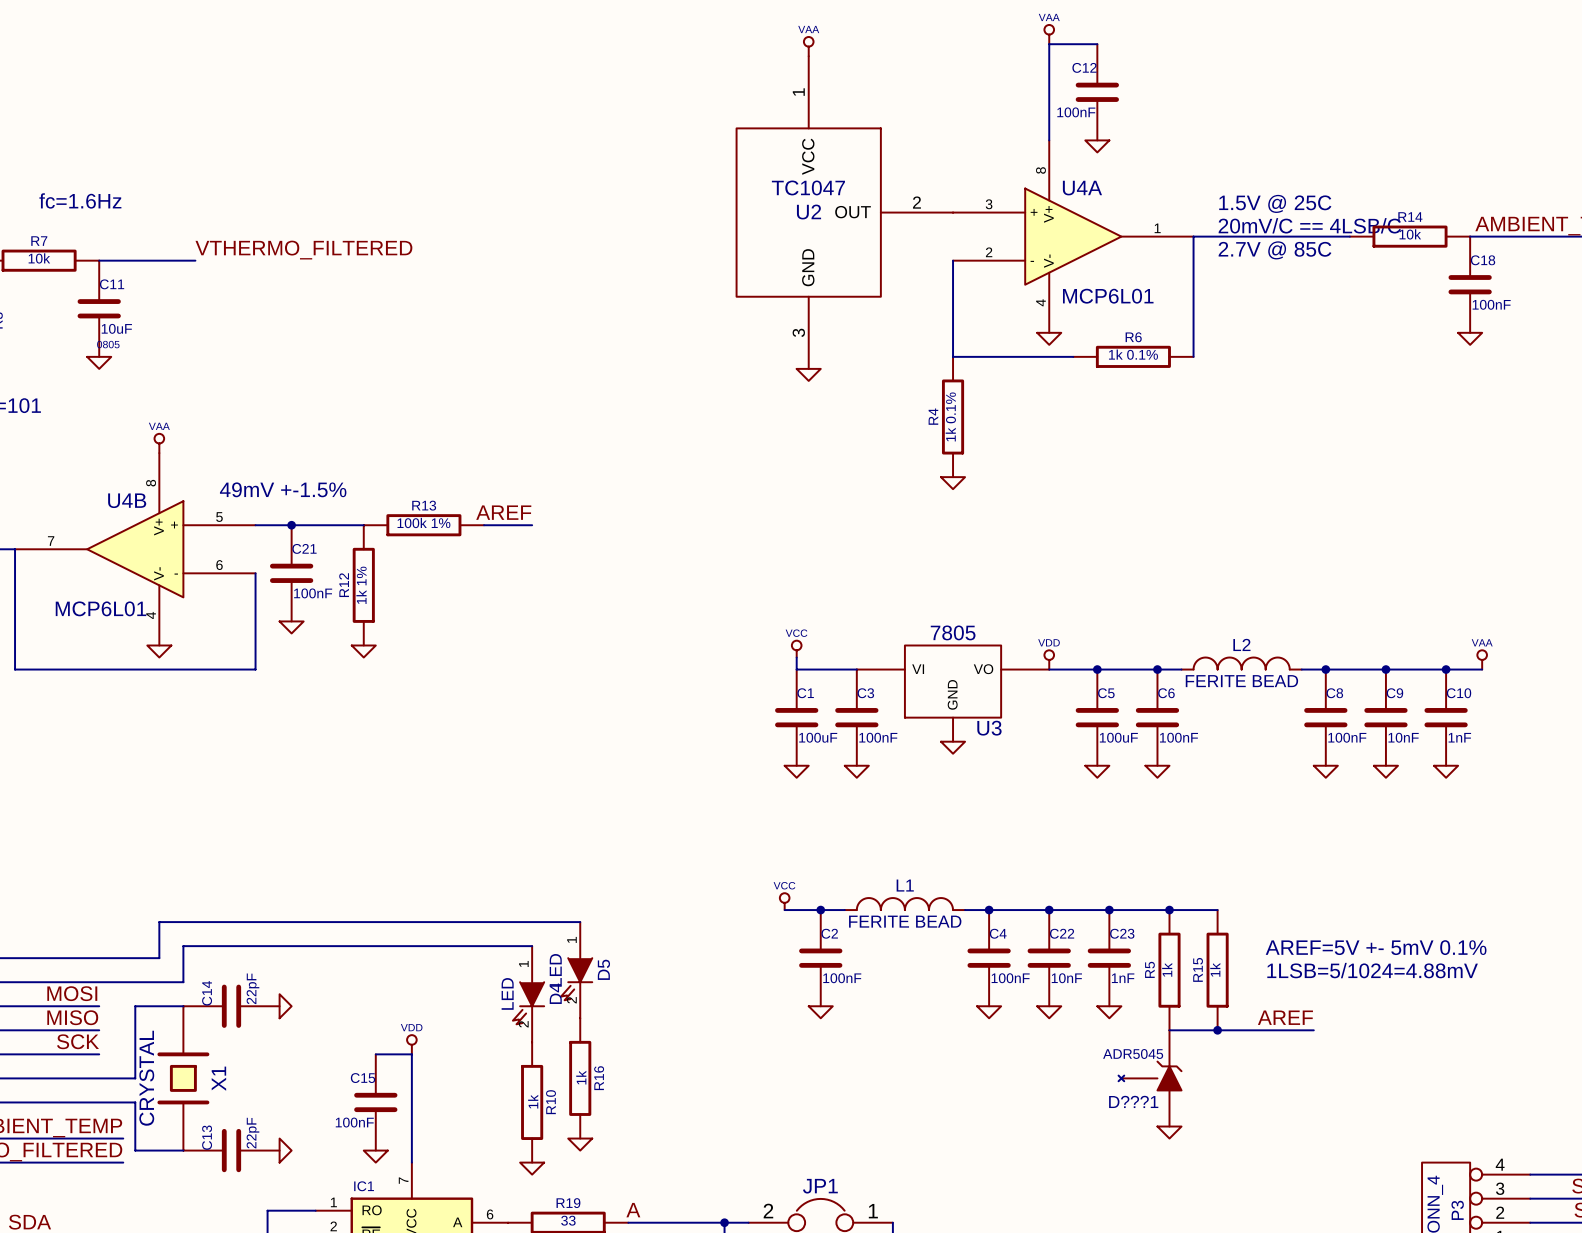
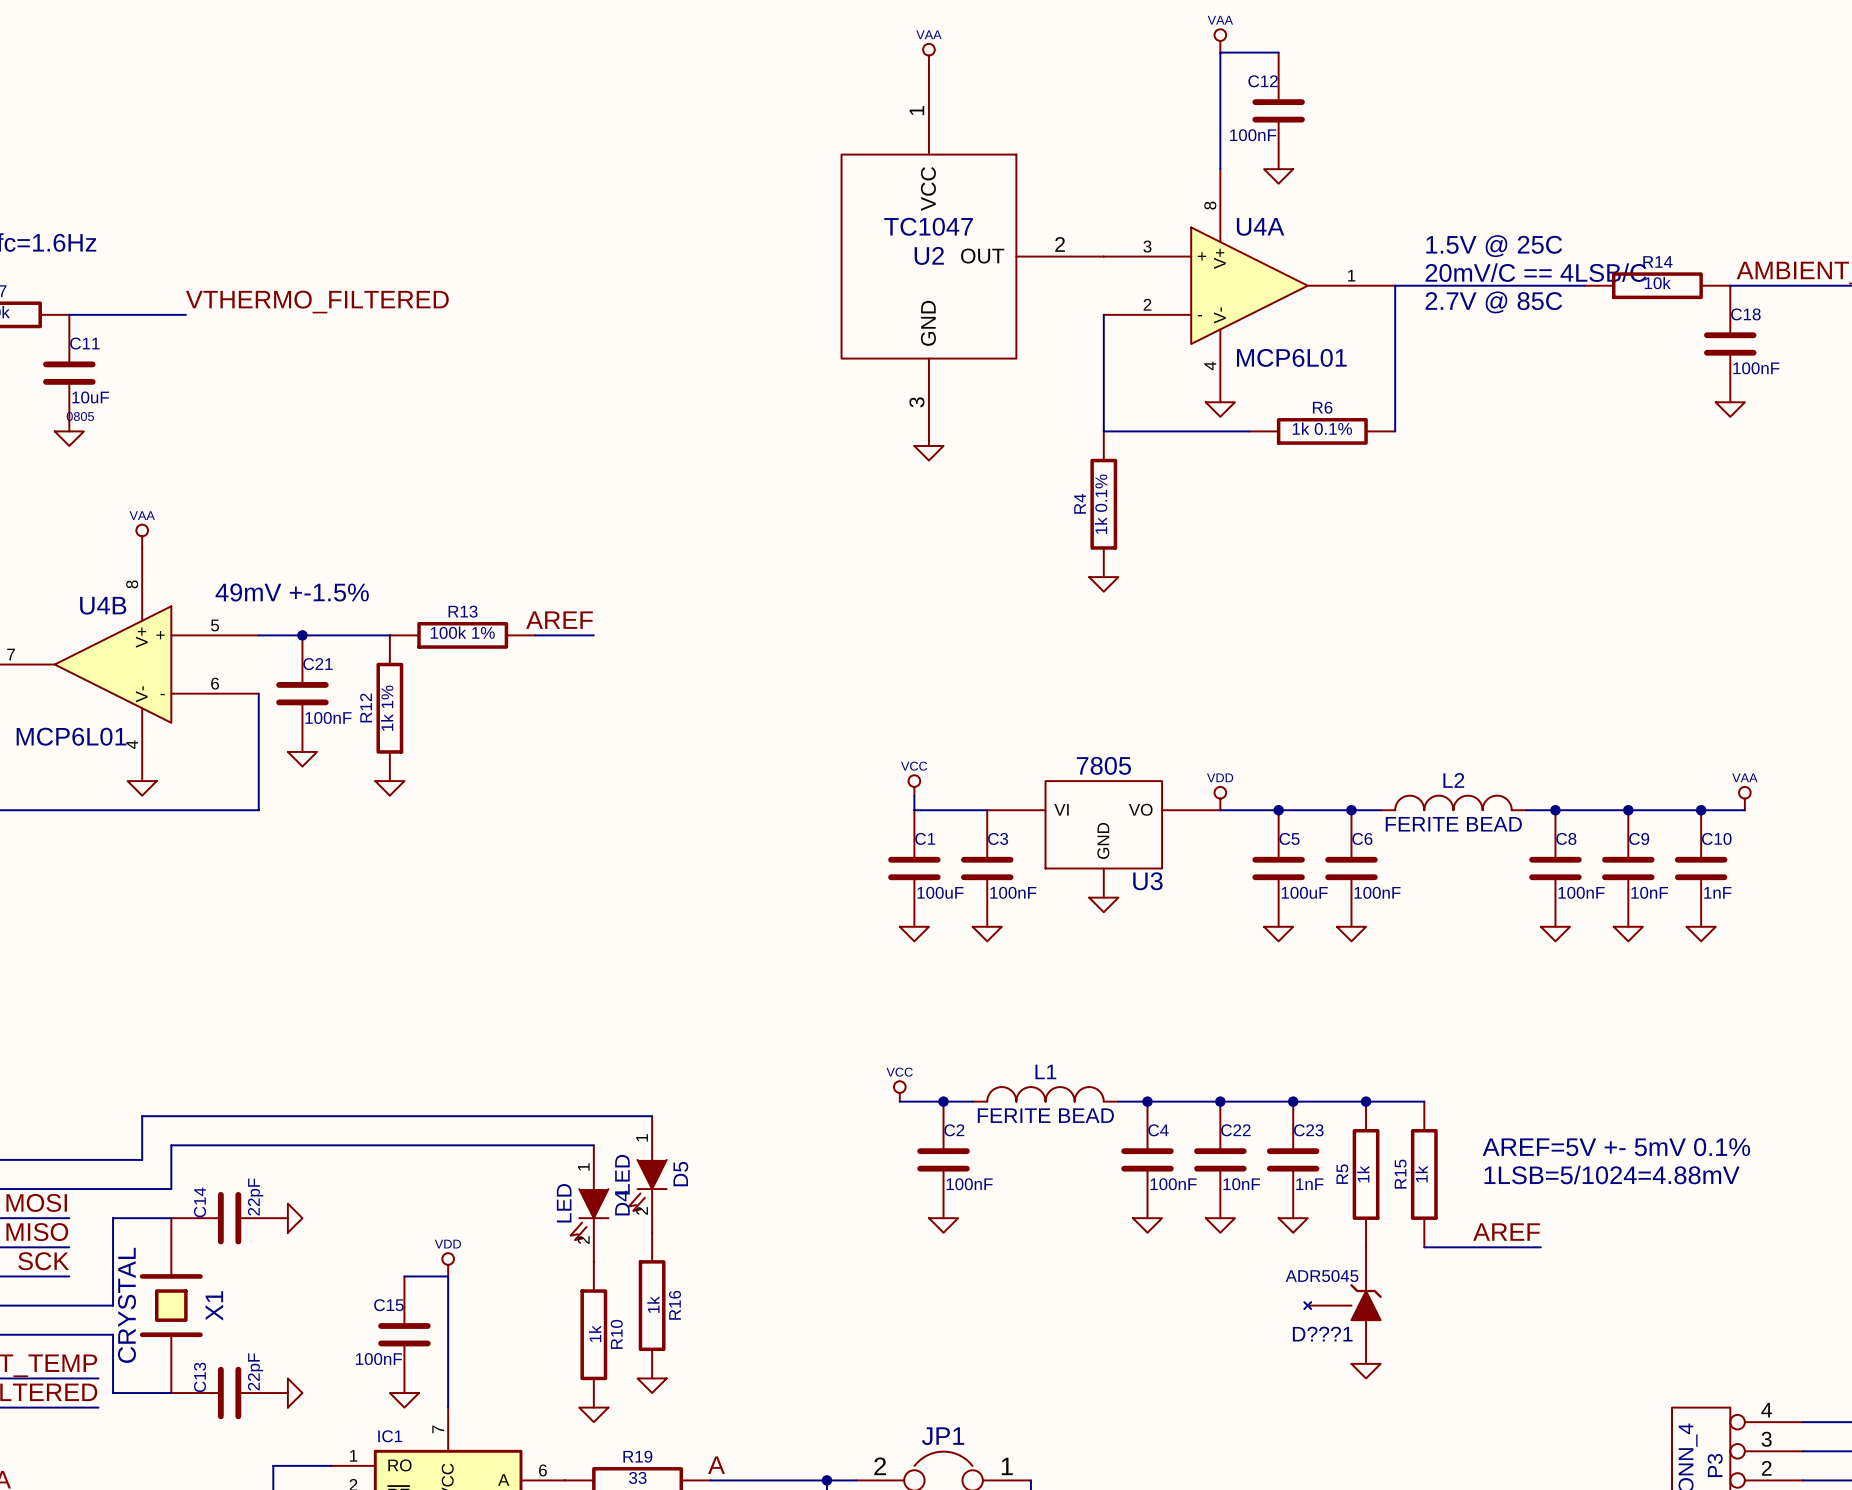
wire: (1169, 1030) (1217, 1030) -> none
junction: (1217, 1030) -> none

